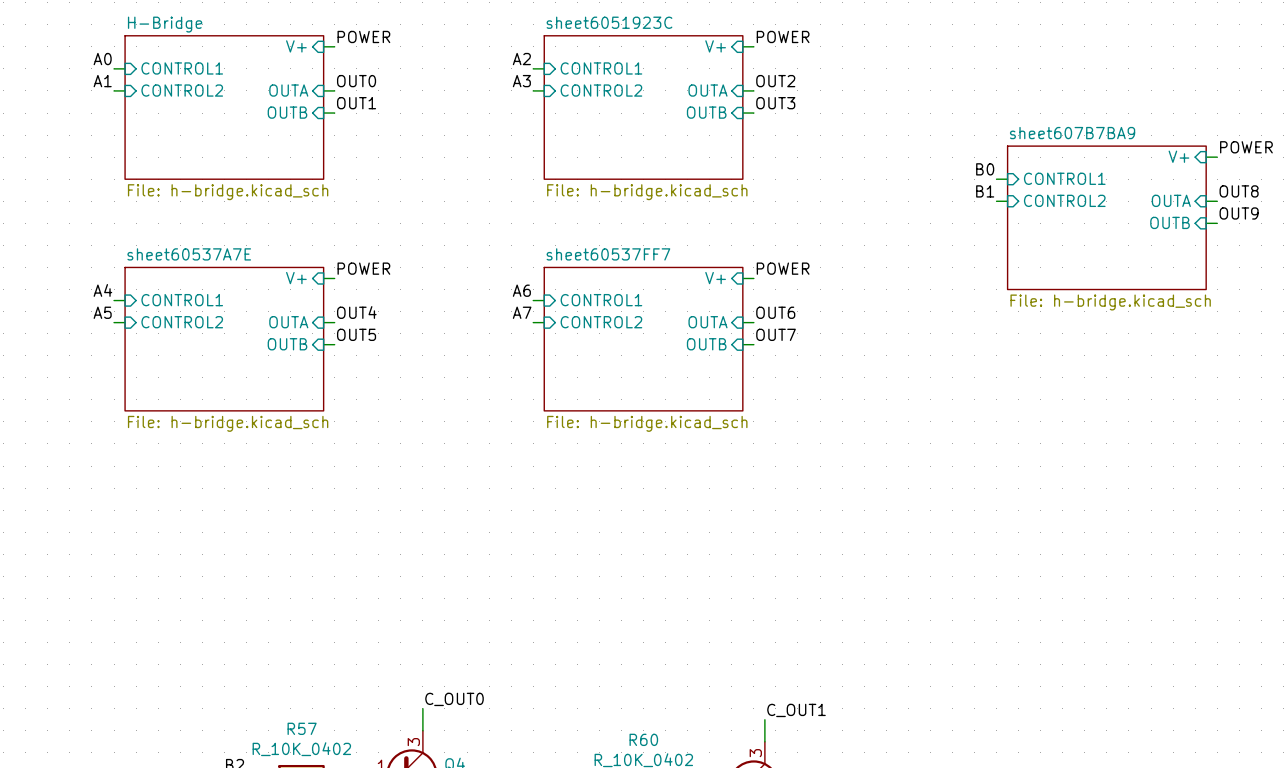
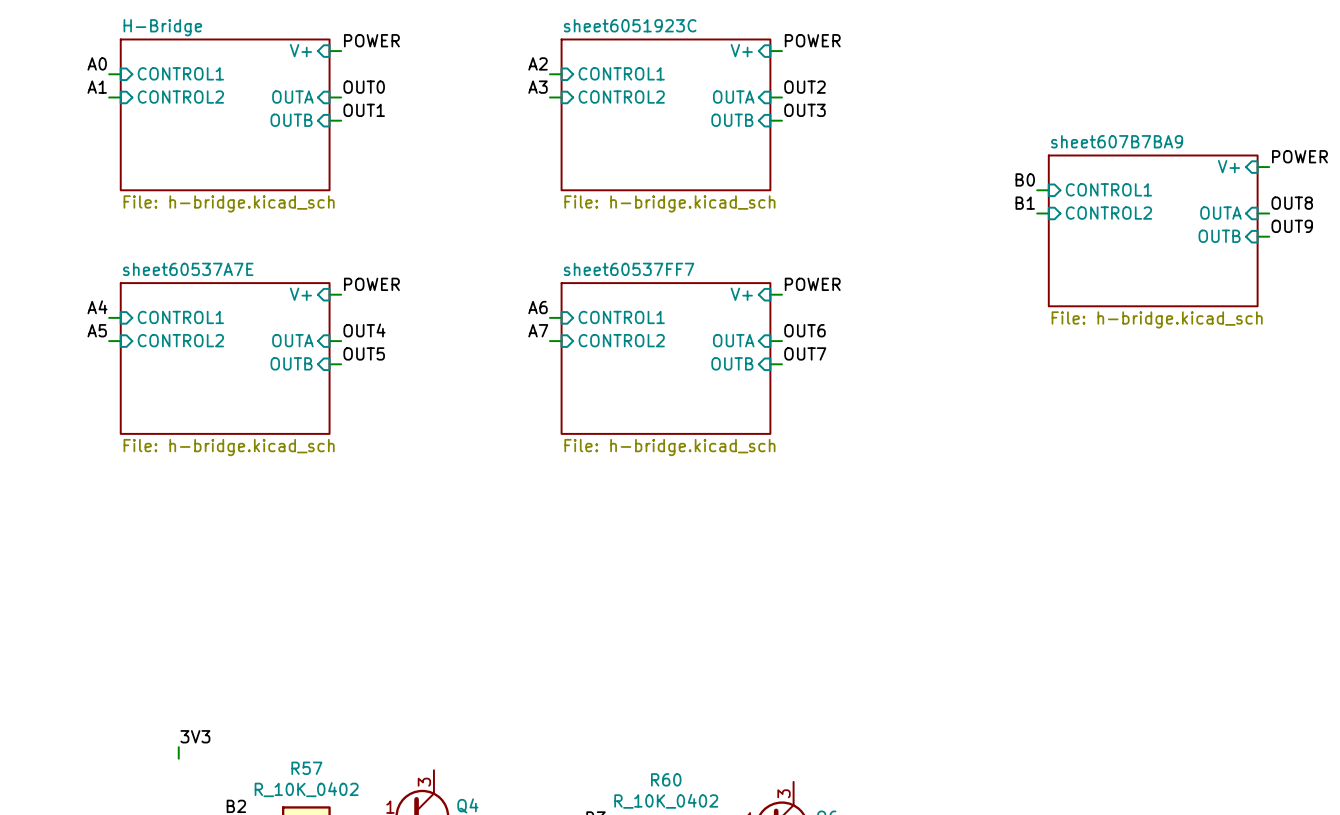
label: none -> 3V3 (195, 736)
label: C_OUT0 (454, 699) -> none
wire: none -> (178, 747) (178, 758)
wire: (422, 708) (422, 730) -> none
label: C_OUT1 (796, 710) -> none
wire: (764, 719) (764, 741) -> none

